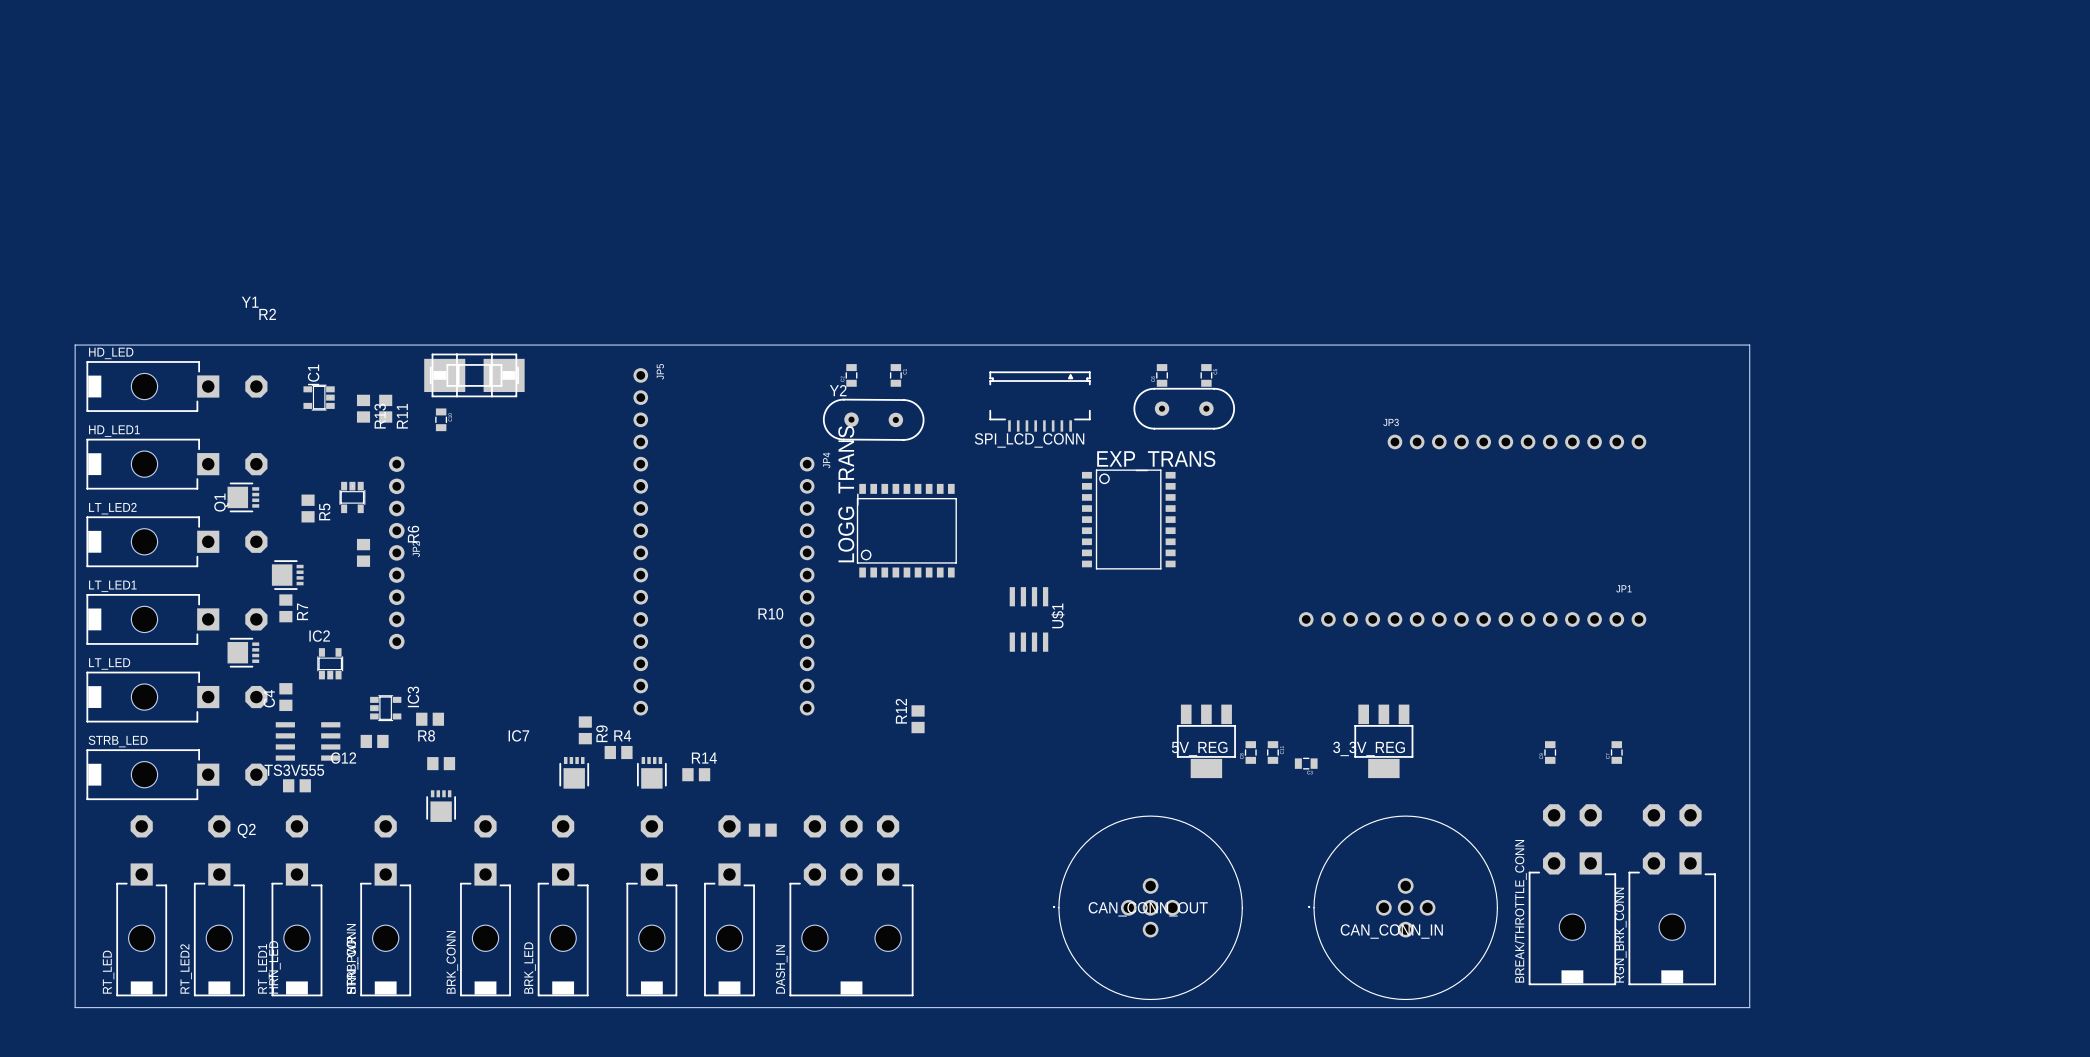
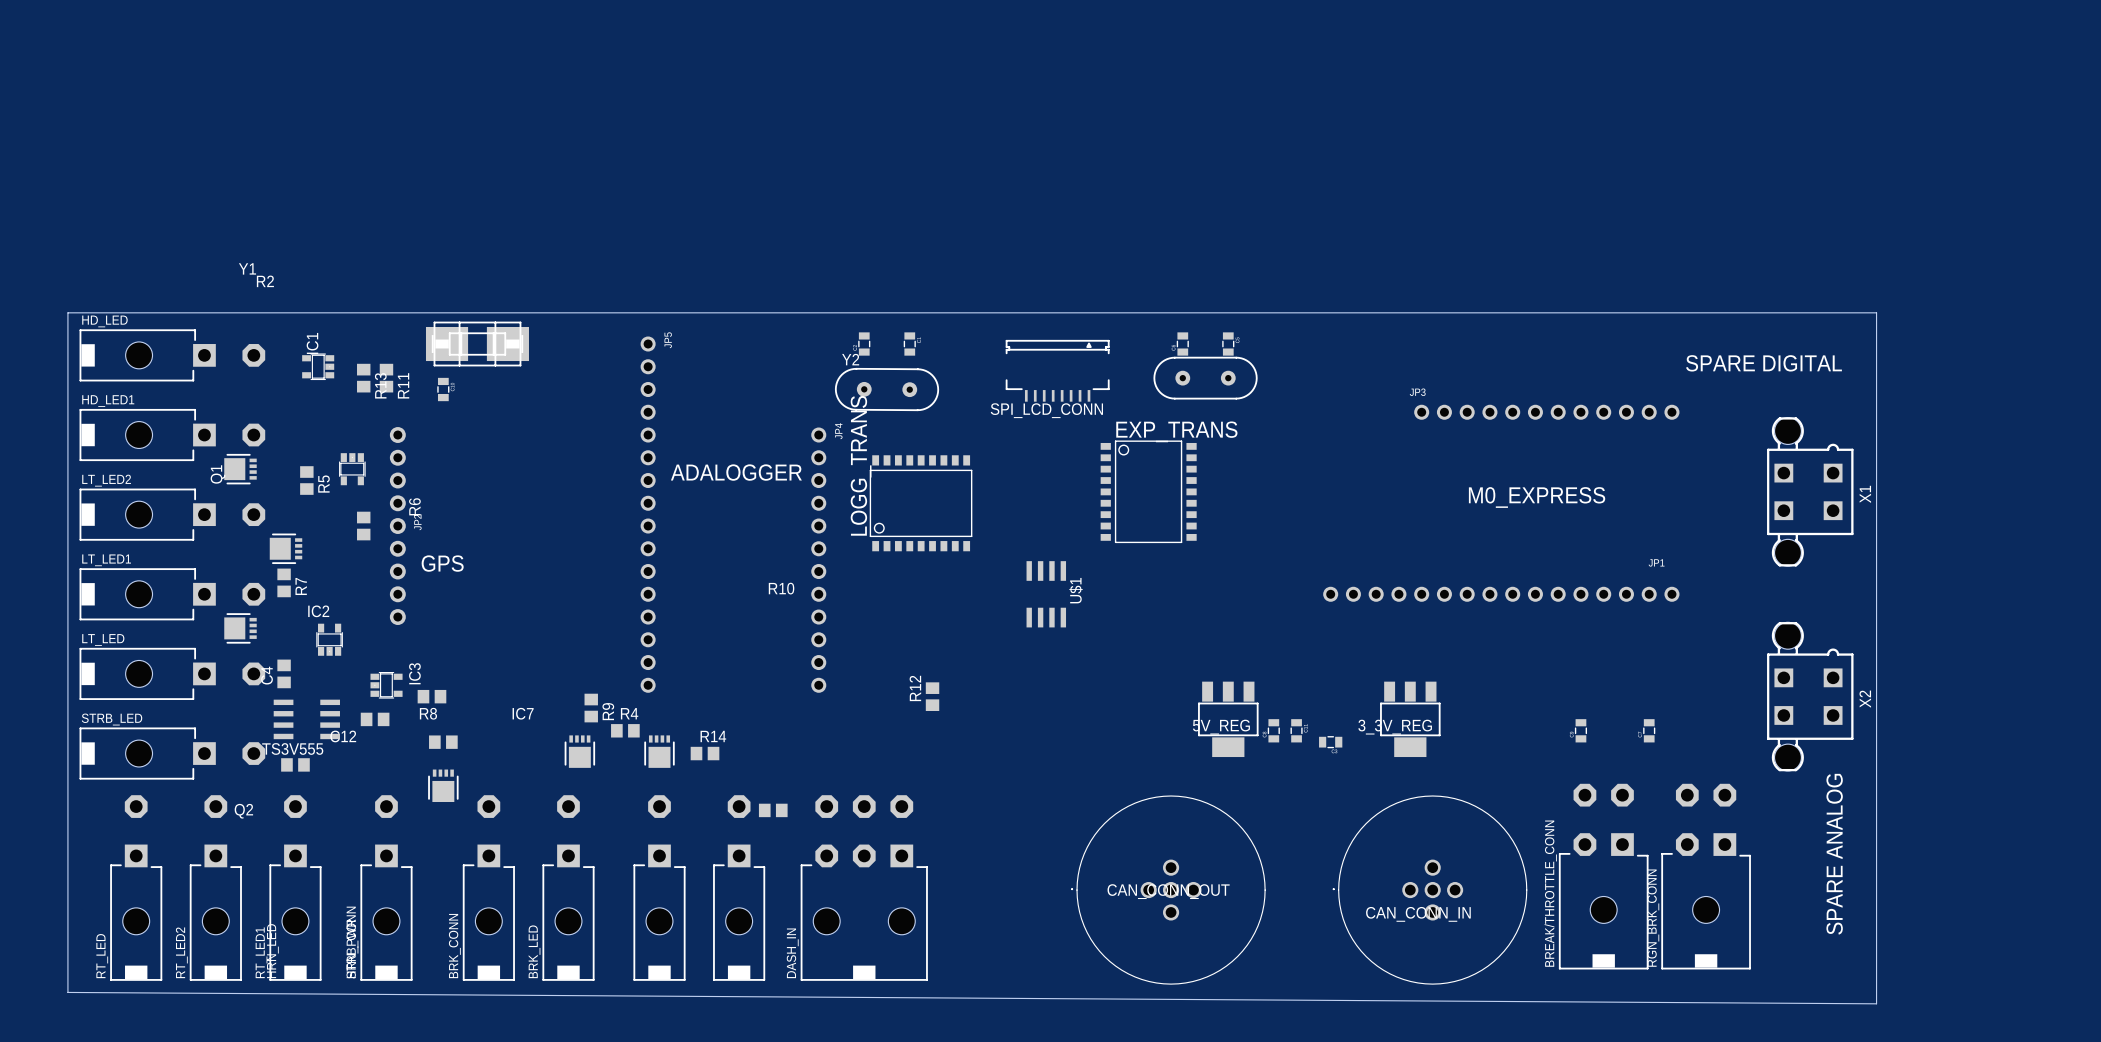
board edge: (1749, 345) (1749, 1007) (75, 1007) -> (1785, 312) (1876, 312) (1876, 1003) (67, 992)
text: none -> SPARE DIGITAL (1764, 363)
text: none -> ADALOGGER (736, 472)
X1: none -> (1810, 491)
text: none -> M0_EXPRESS (1537, 497)
text: none -> GPS (442, 563)
X2: none -> (1810, 696)
text: none -> SPARE ANALOG (1834, 854)

